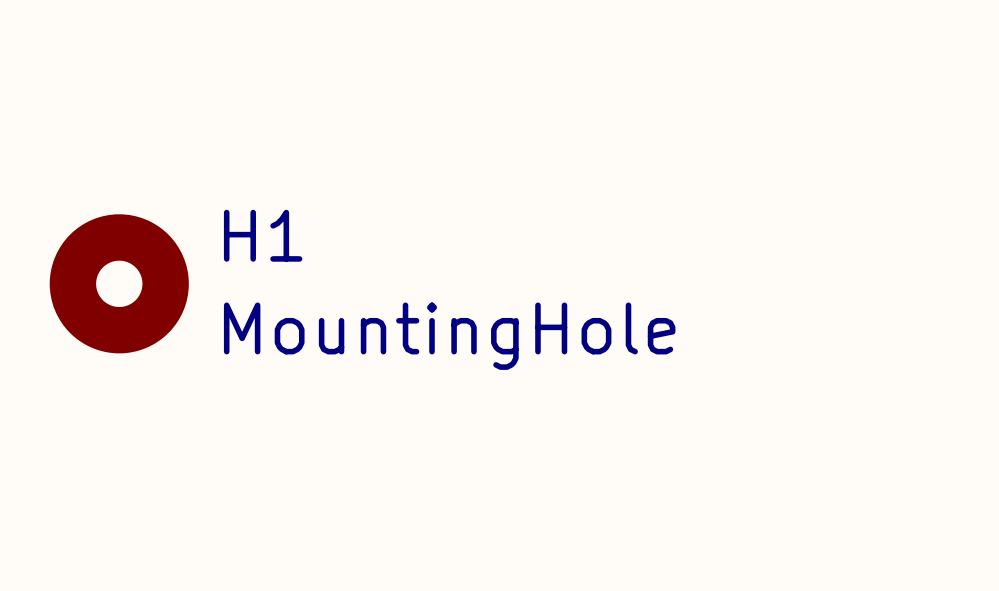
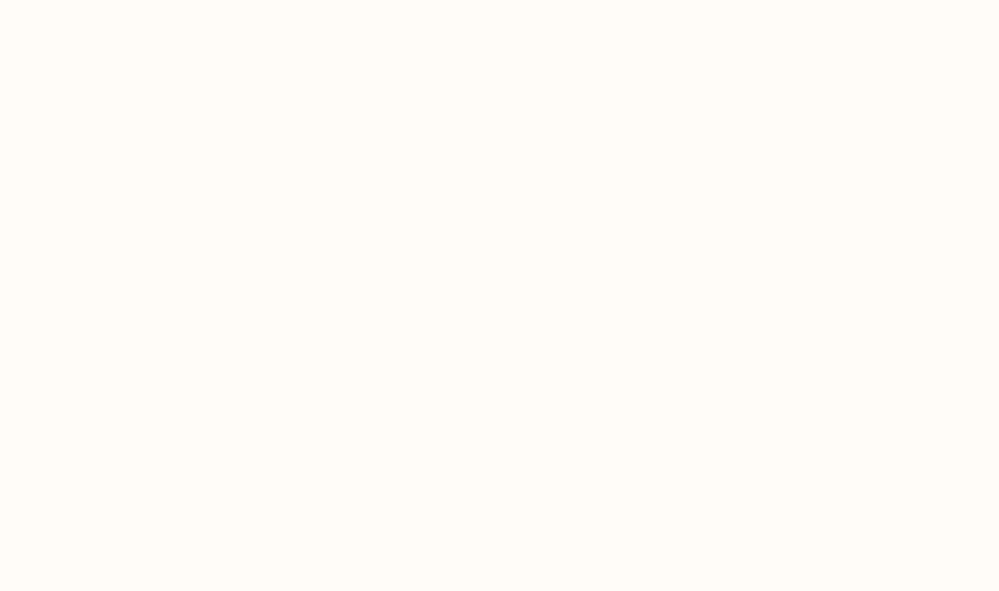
H1: MountingHole (119, 283) -> none

